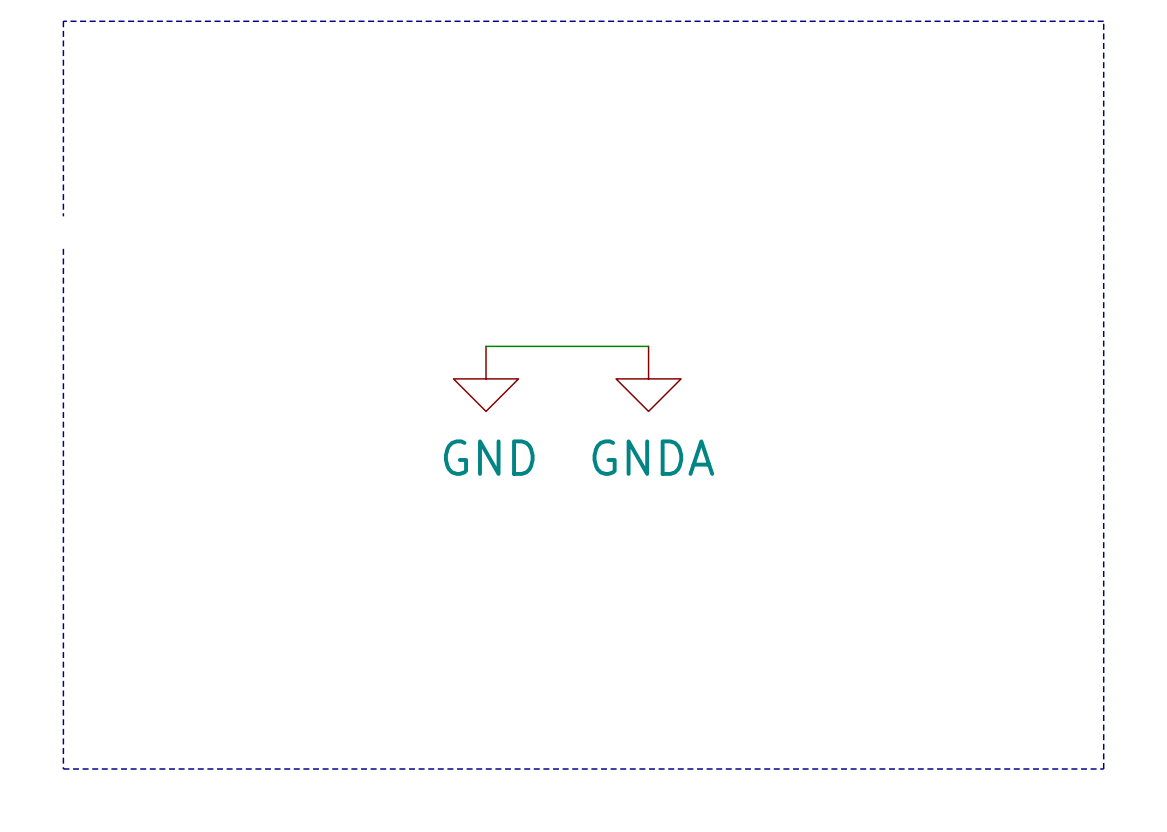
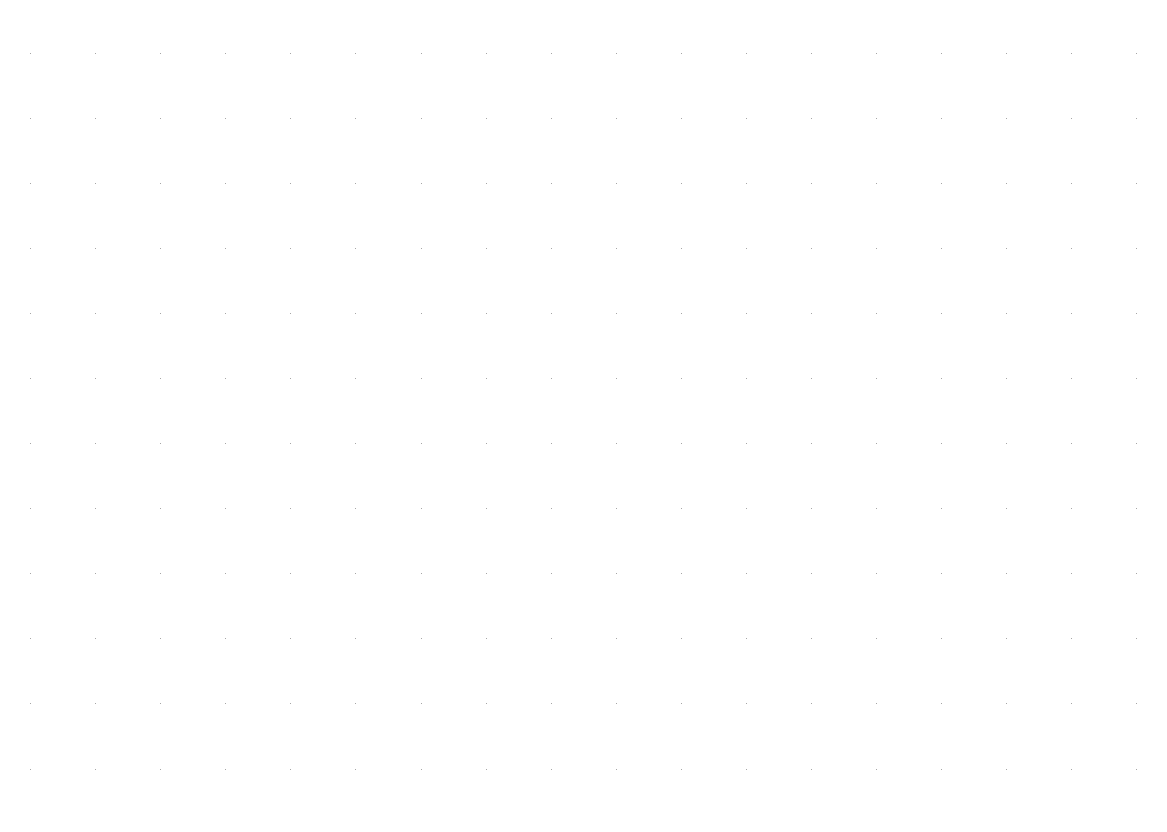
line: (63, 216) (63, 21) (1103, 21) (1103, 769) (63, 769) (63, 248) -> none
wire: (486, 346) (648, 346) -> none
power symbol: GND (486, 378) -> none
power symbol: GNDA (648, 378) -> none

